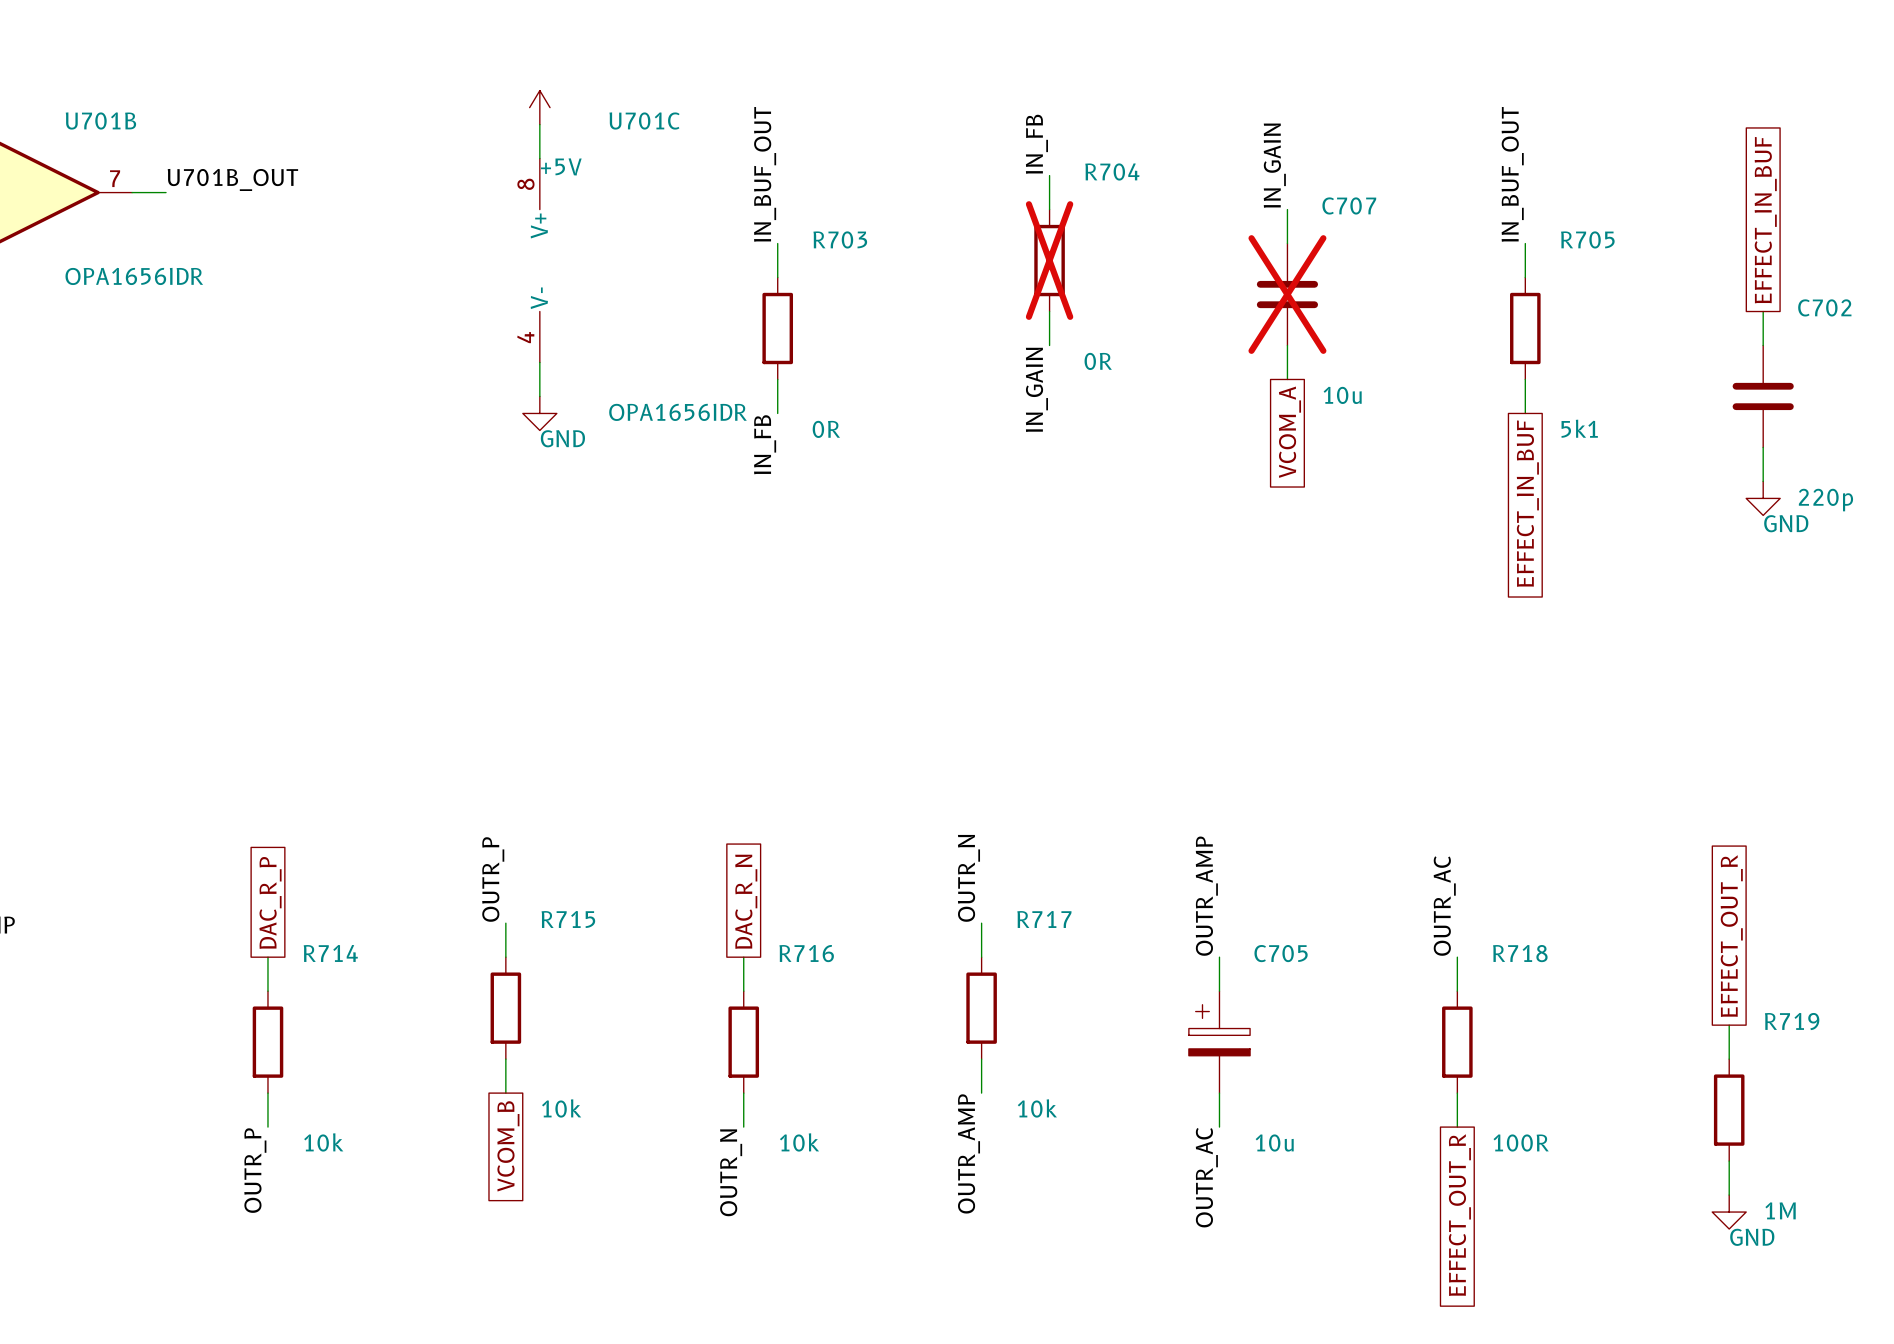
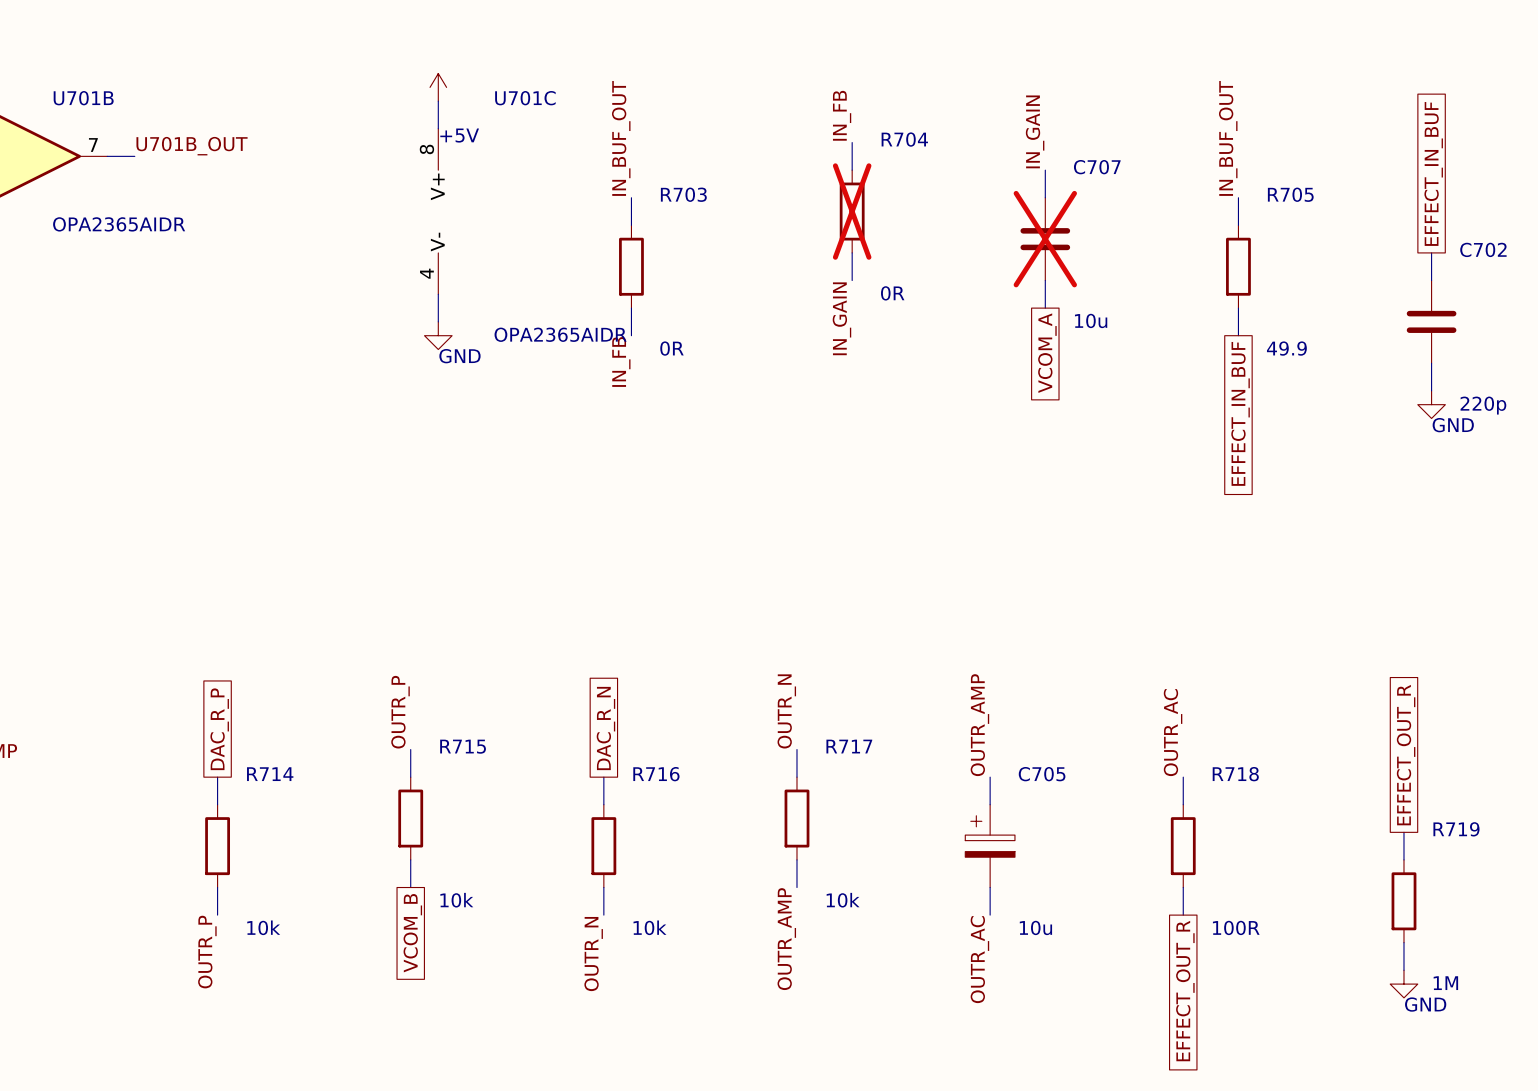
U701B value: OPA1656IDR (134, 276) -> OPA2365AIDR (119, 224)
U701C value: OPA1656IDR (677, 412) -> OPA2365AIDR (560, 334)
R705 value: 5k1 (1579, 428) -> 49.9 (1286, 348)

